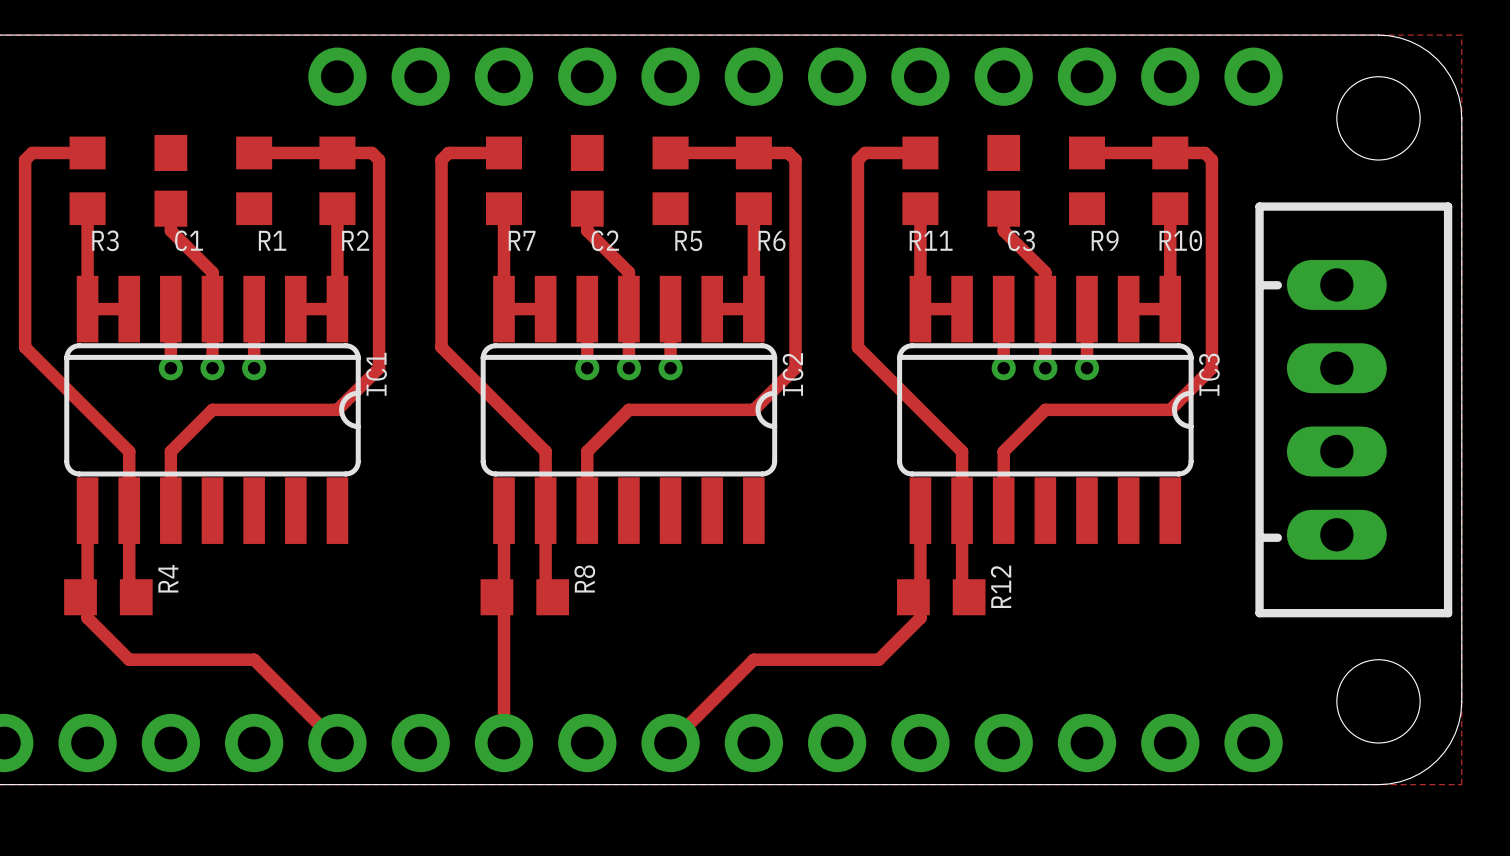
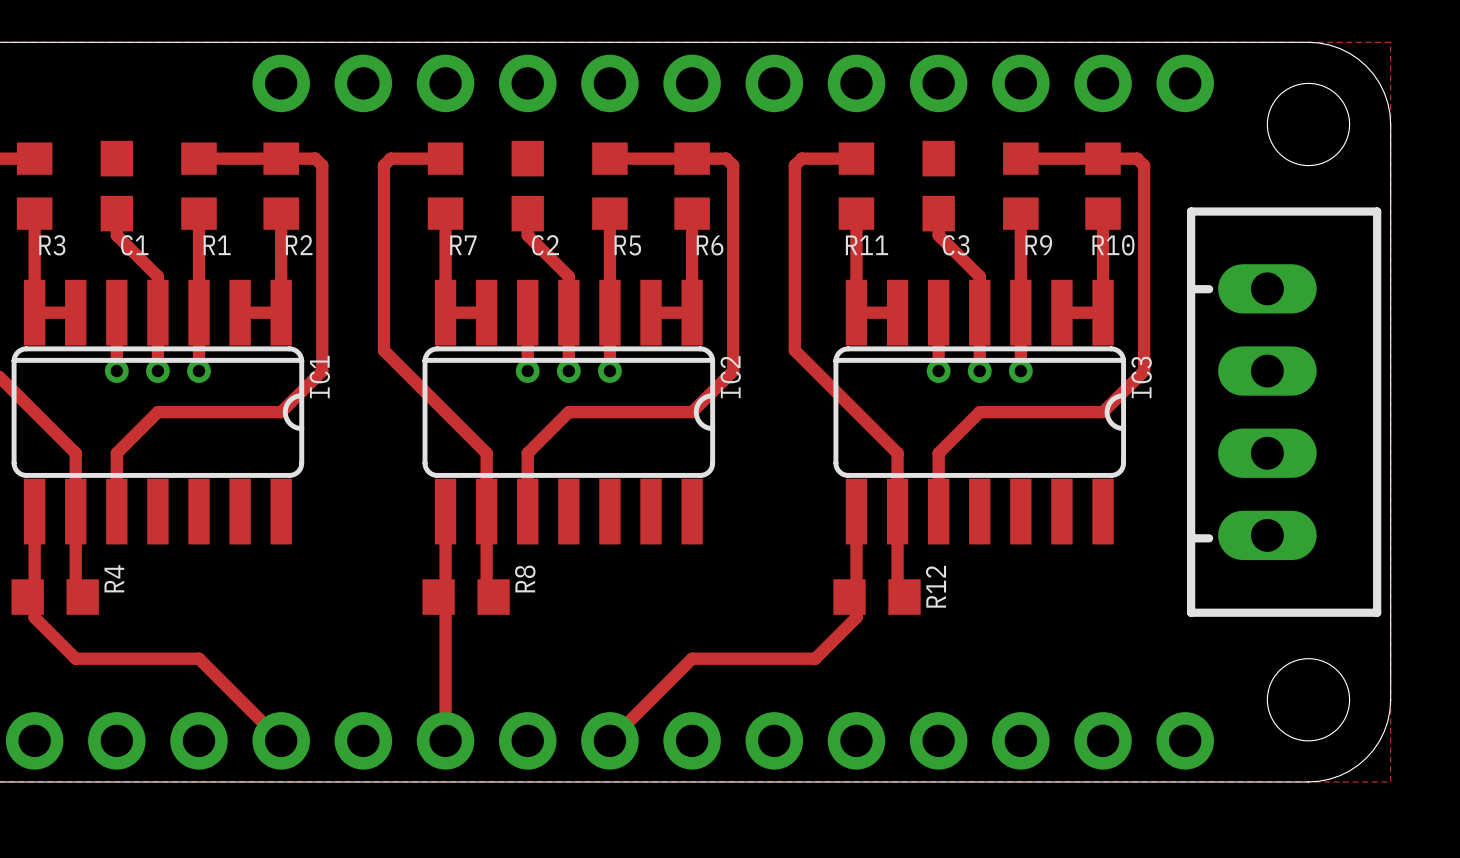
track: none -> (199, 213) (199, 312)
track: none -> (609, 213) (609, 312)
track: none -> (1020, 213) (1020, 312)

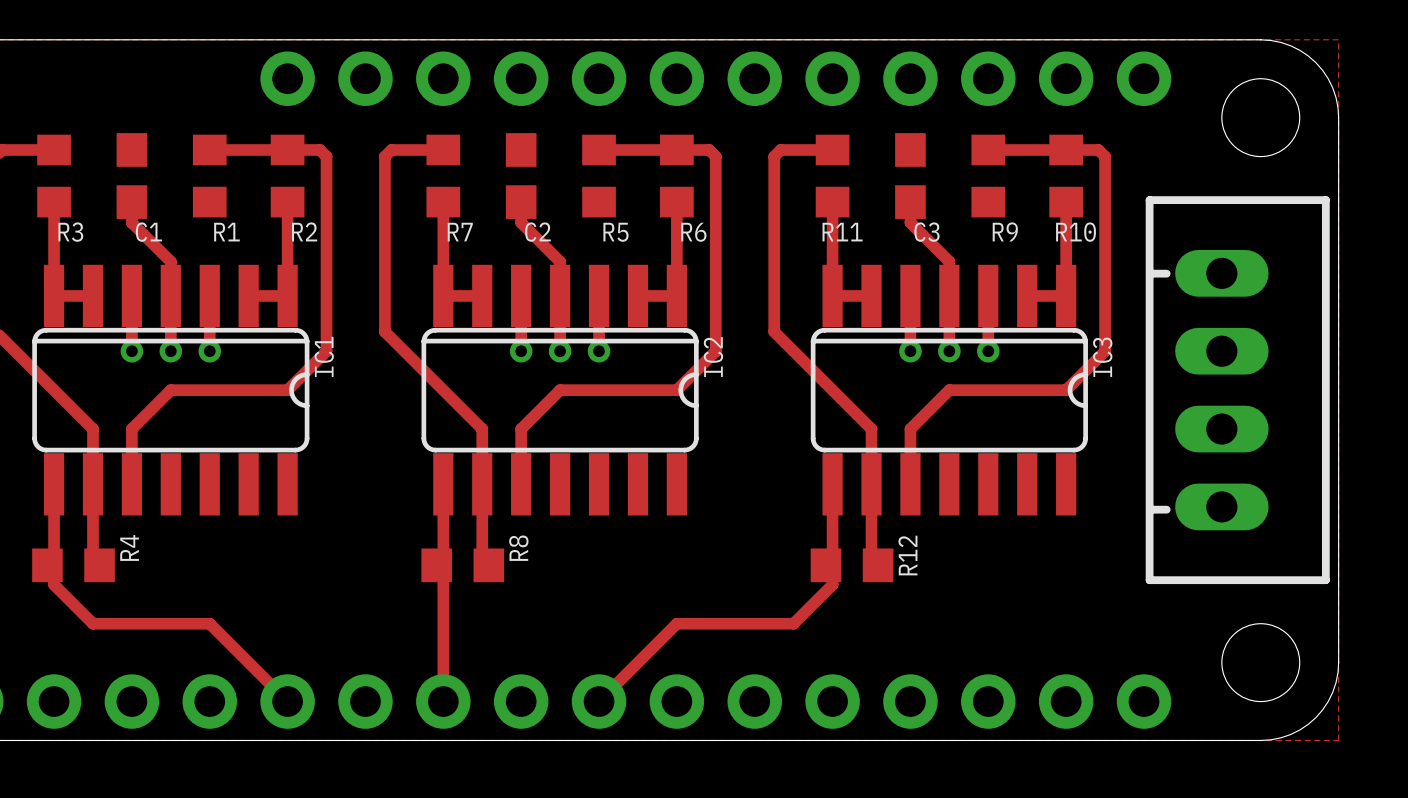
track: (199, 213) (199, 312) -> none
track: (609, 213) (609, 312) -> none
track: (1020, 213) (1020, 312) -> none

